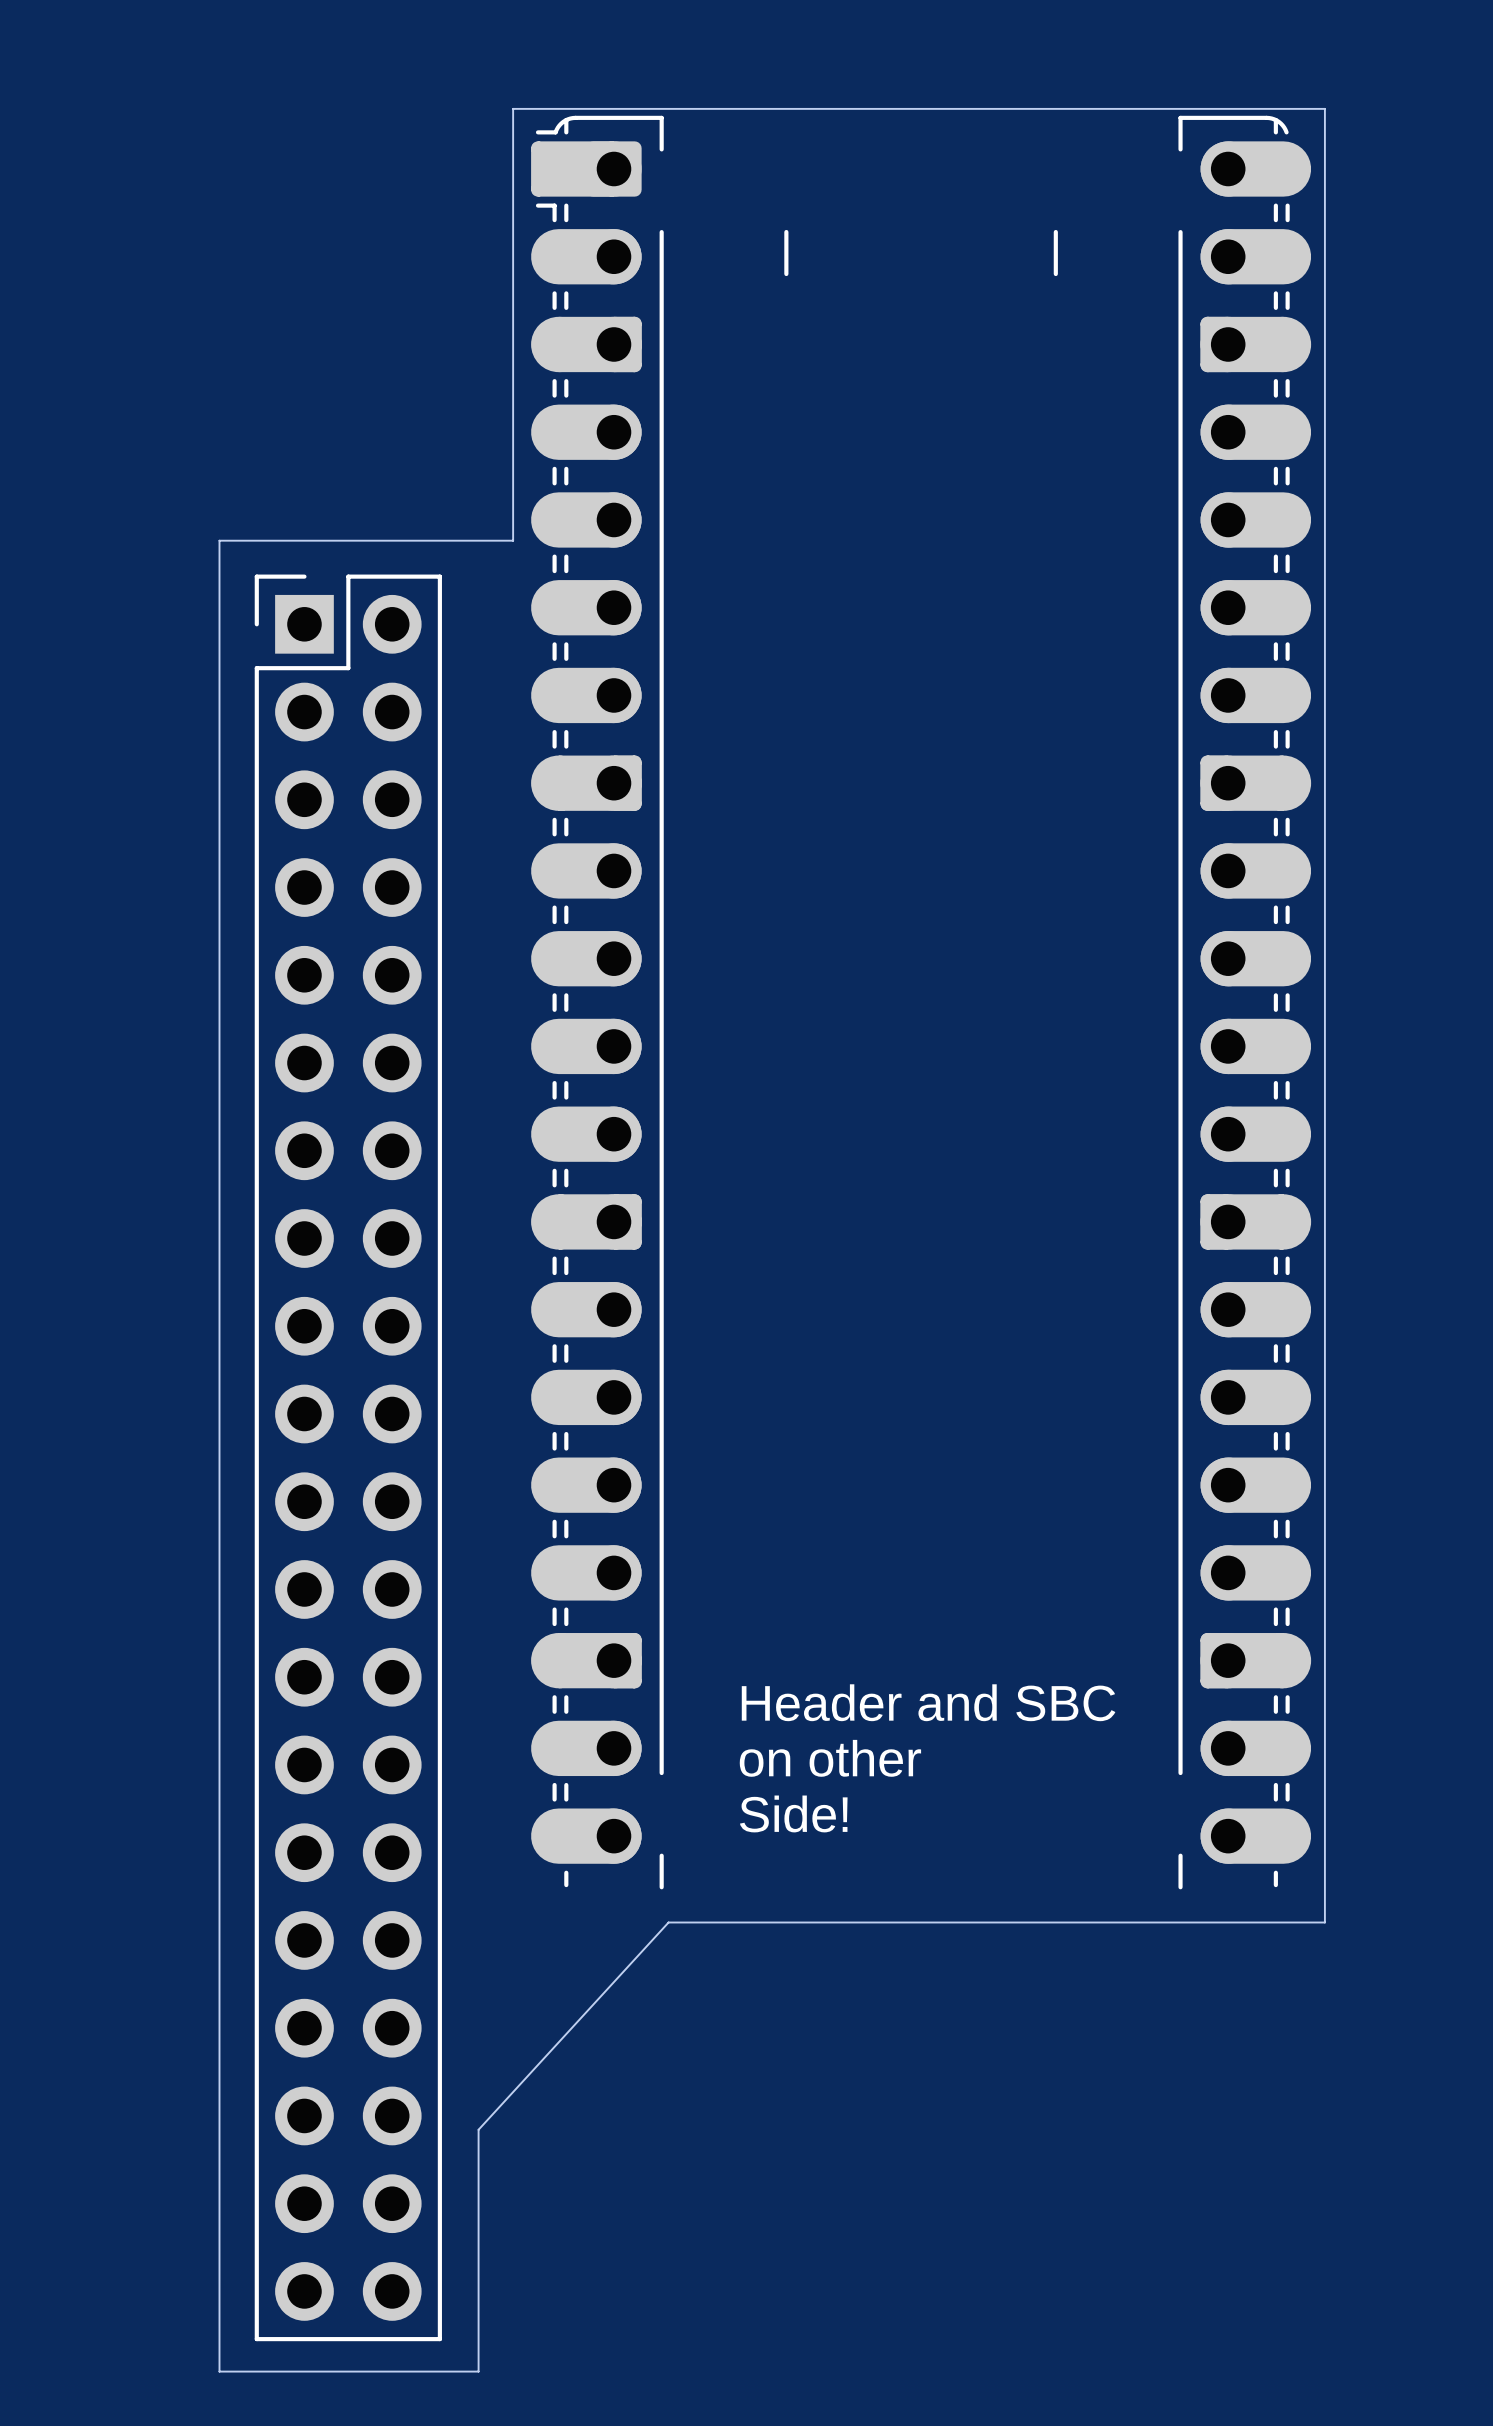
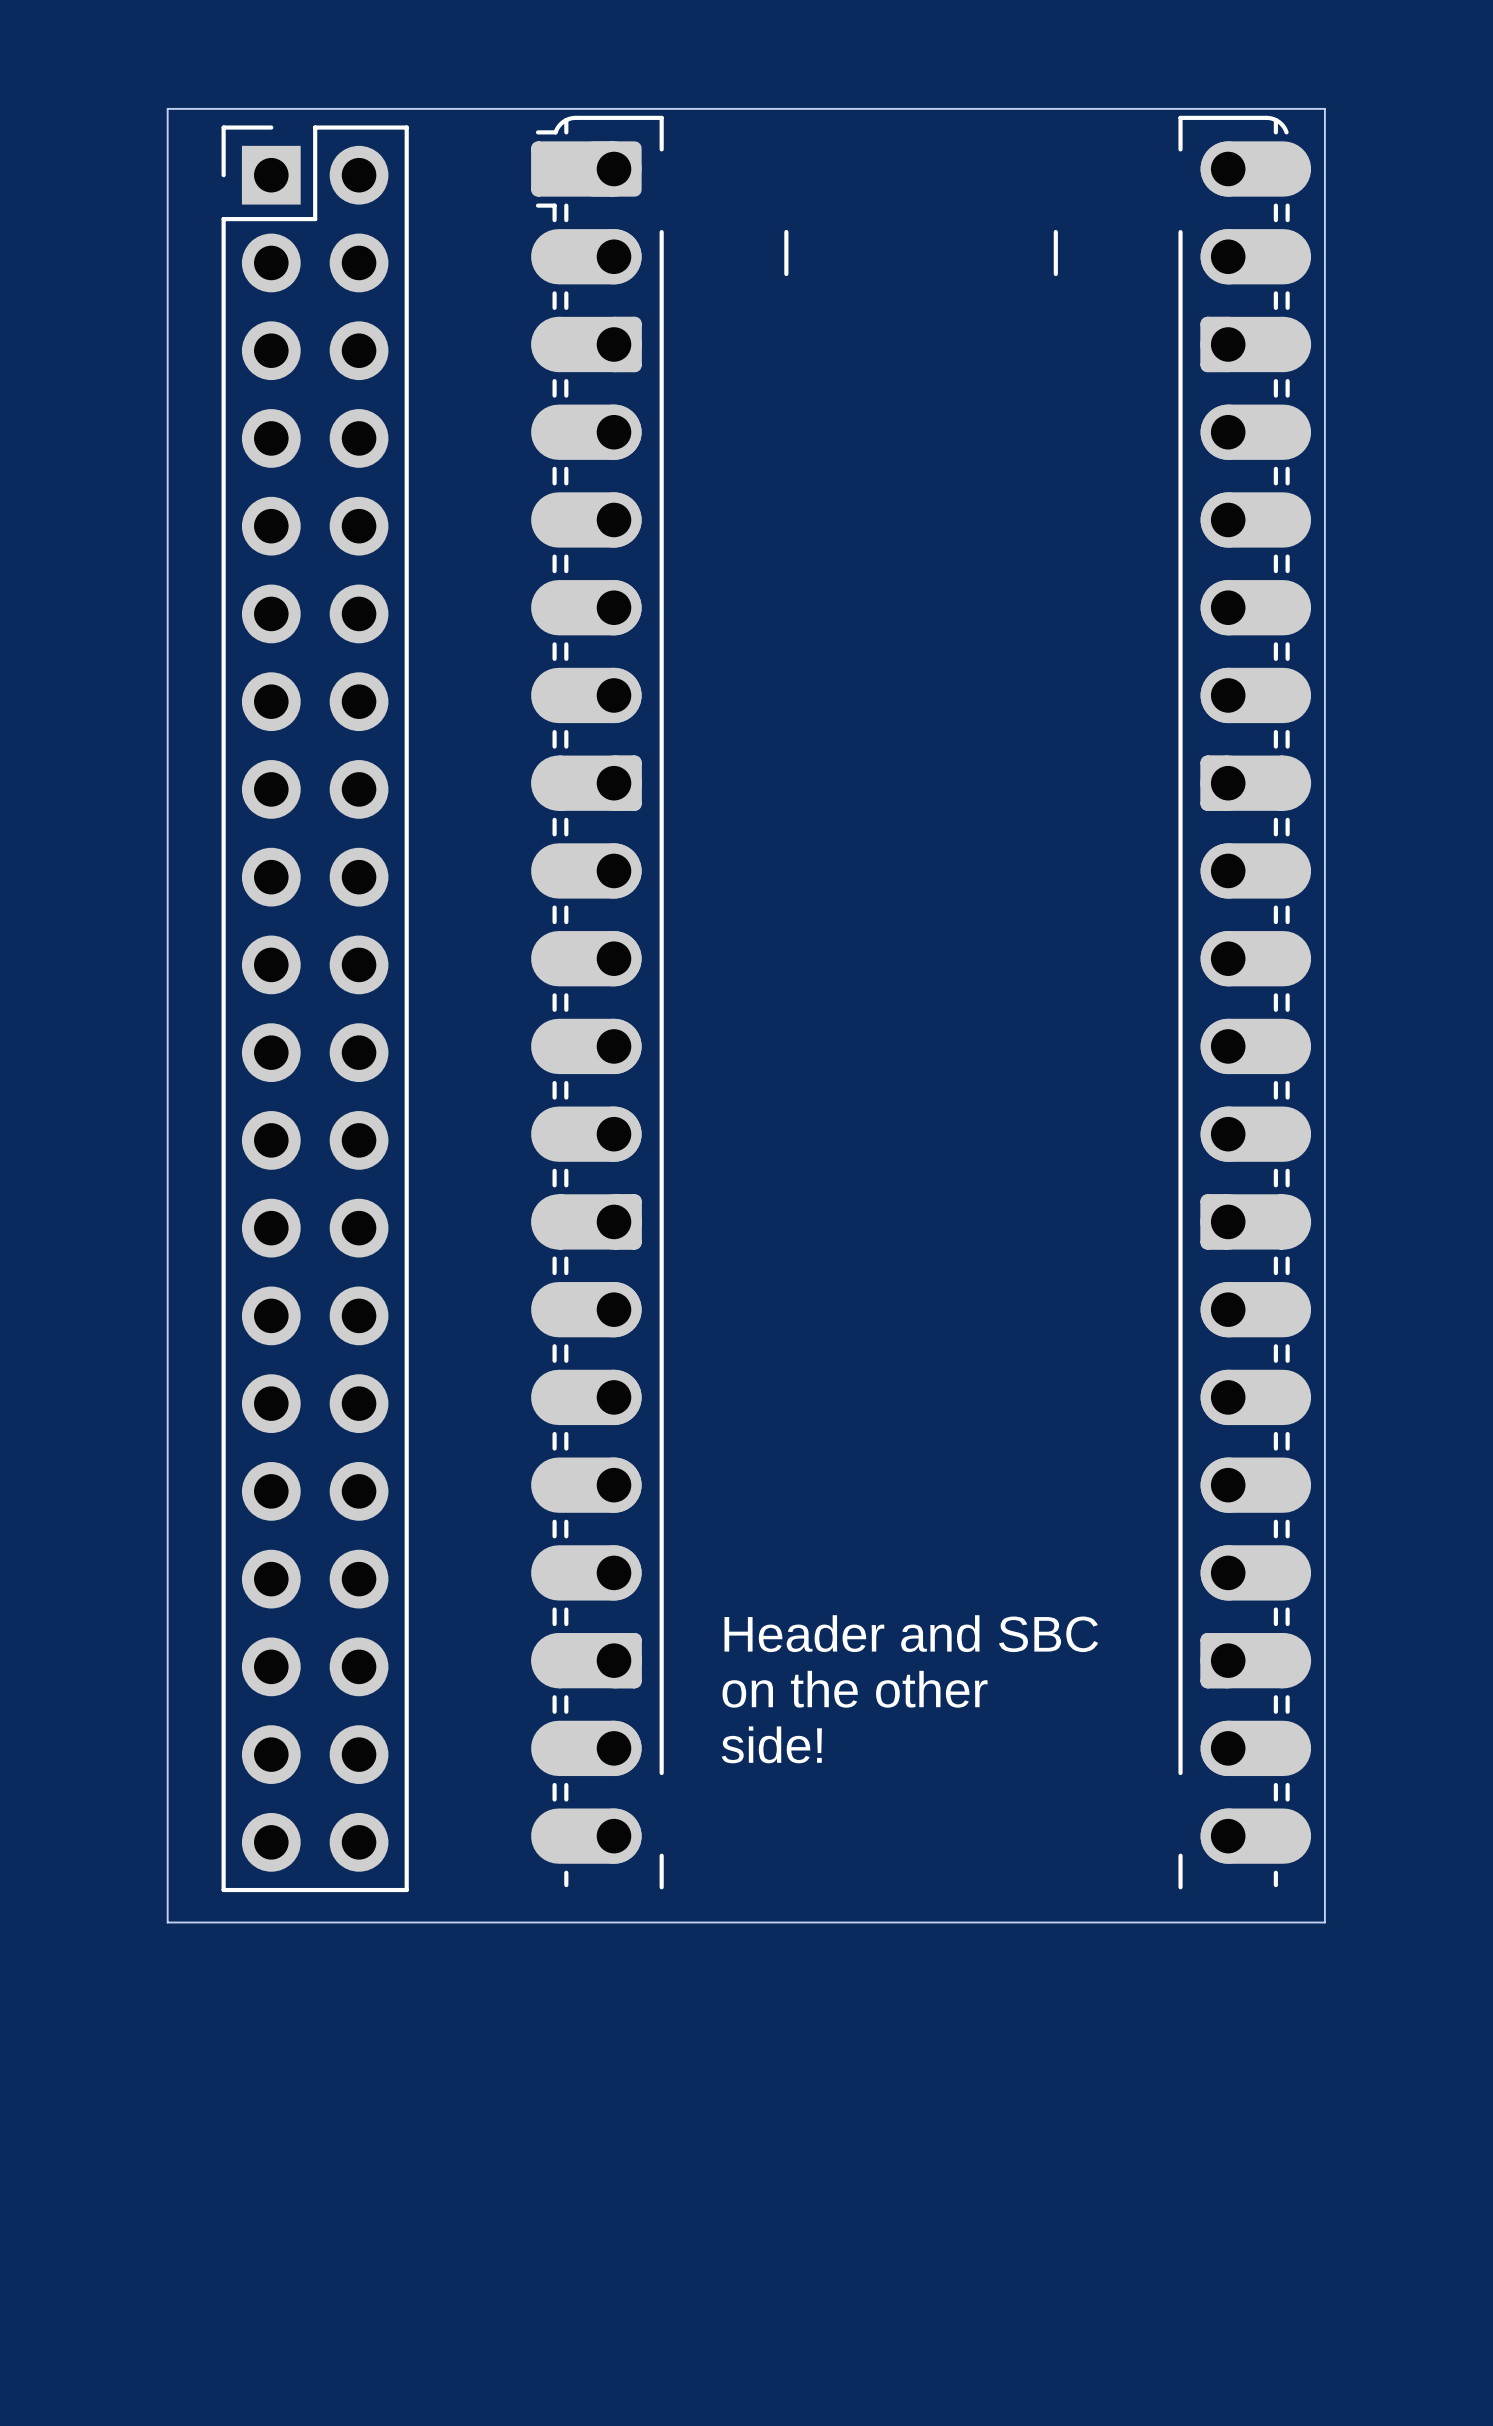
board edge: (513, 108) (513, 540) (219, 540) (219, 2371) (478, 2371) (478, 2129) (668, 1922) -> (513, 108) (167, 108) (167, 1922) (668, 1922)
part position: (348, 1457) -> (315, 1008)
text: none -> on the other (855, 1689)
text position: Header and SBC (928, 1702) -> Header and SBC (911, 1633)
text: on other (830, 1758) -> side! (771, 1744)
text: Side! (793, 1813) -> none

